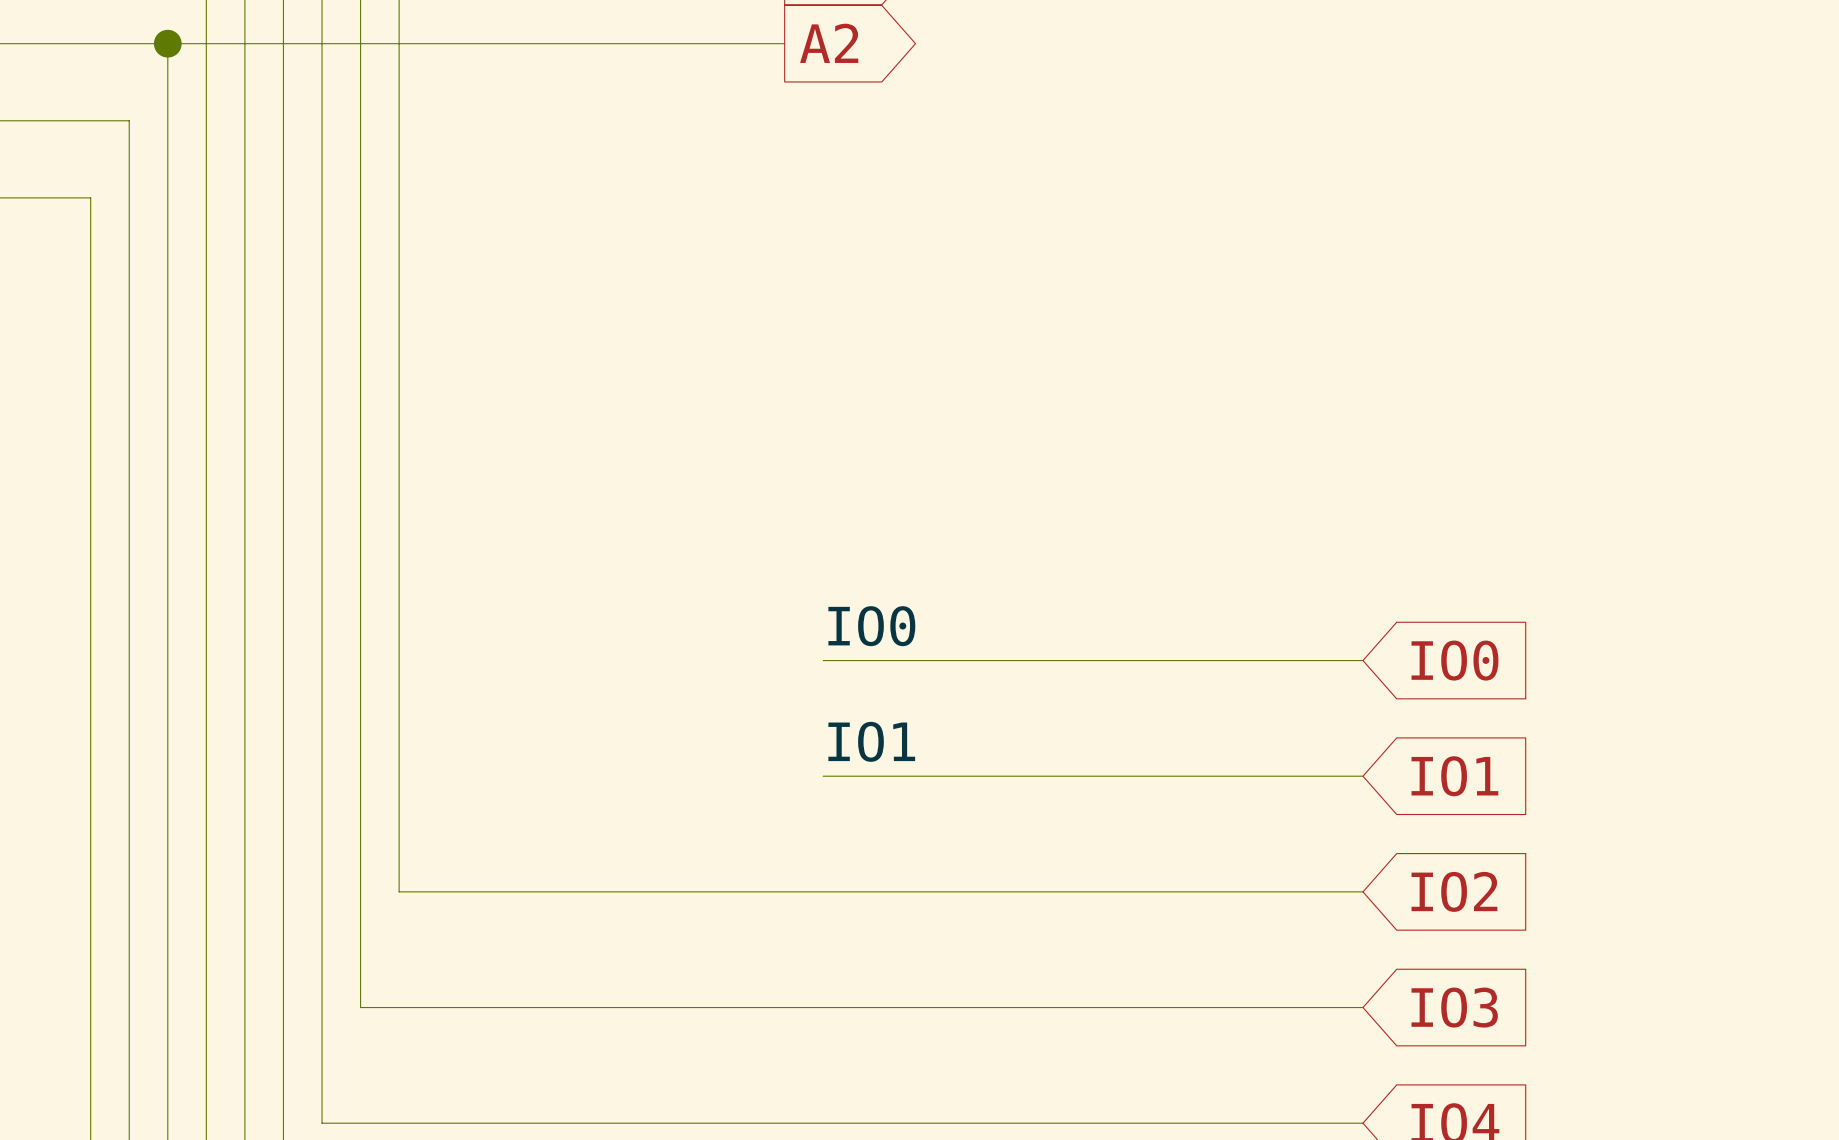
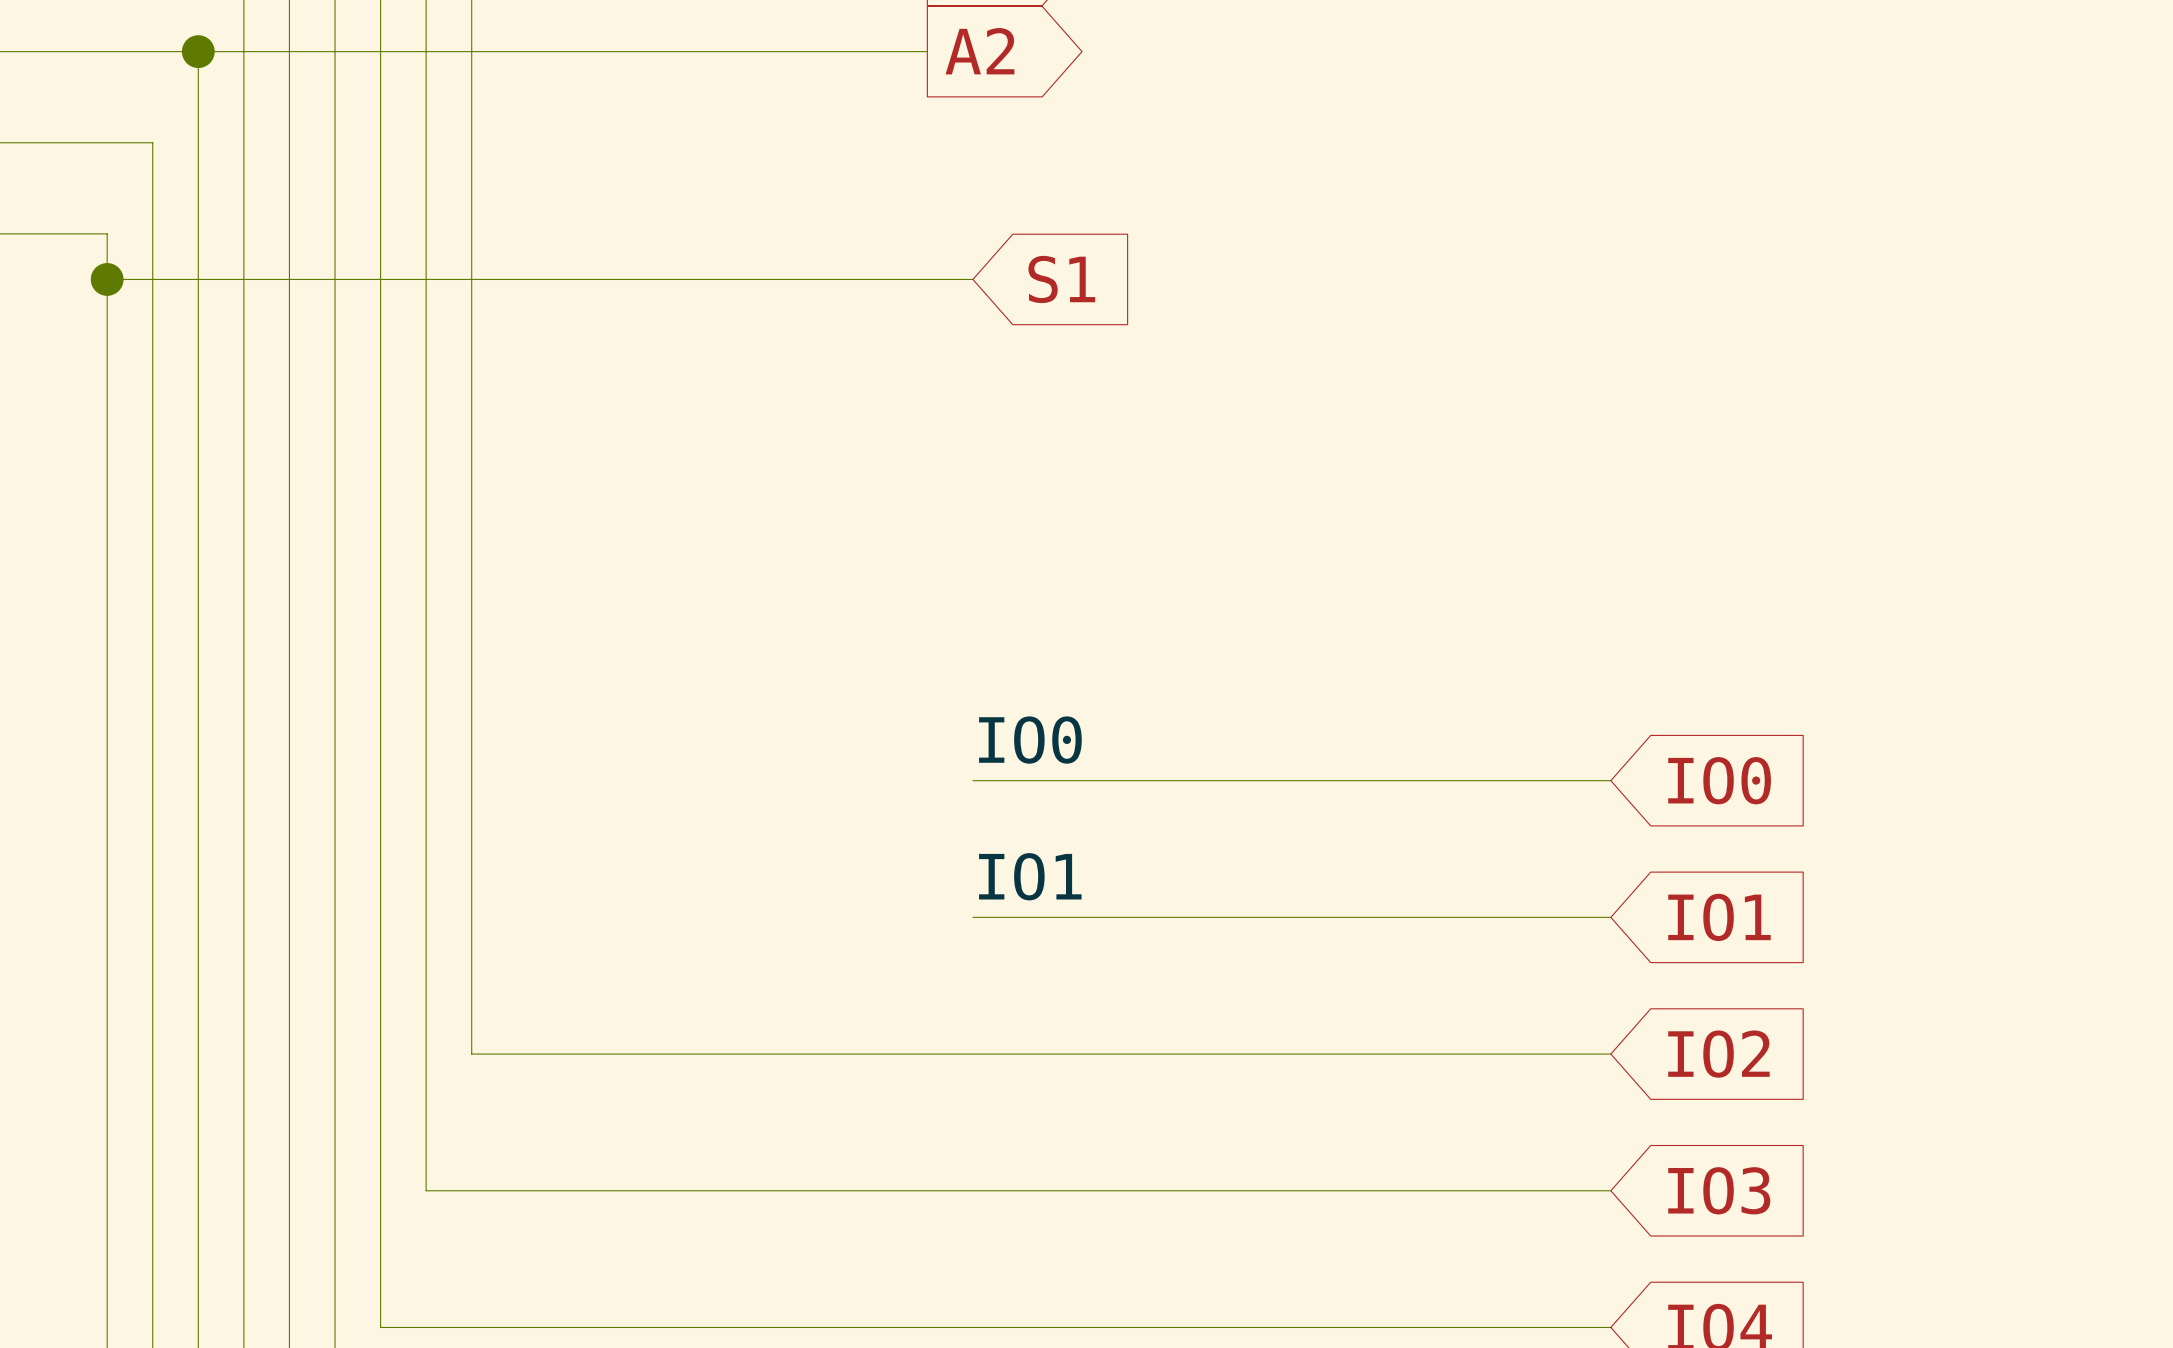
wire: none -> (107, 279) (972, 279)
junction: none -> (107, 279)
global label: none -> S1 (1061, 279)

